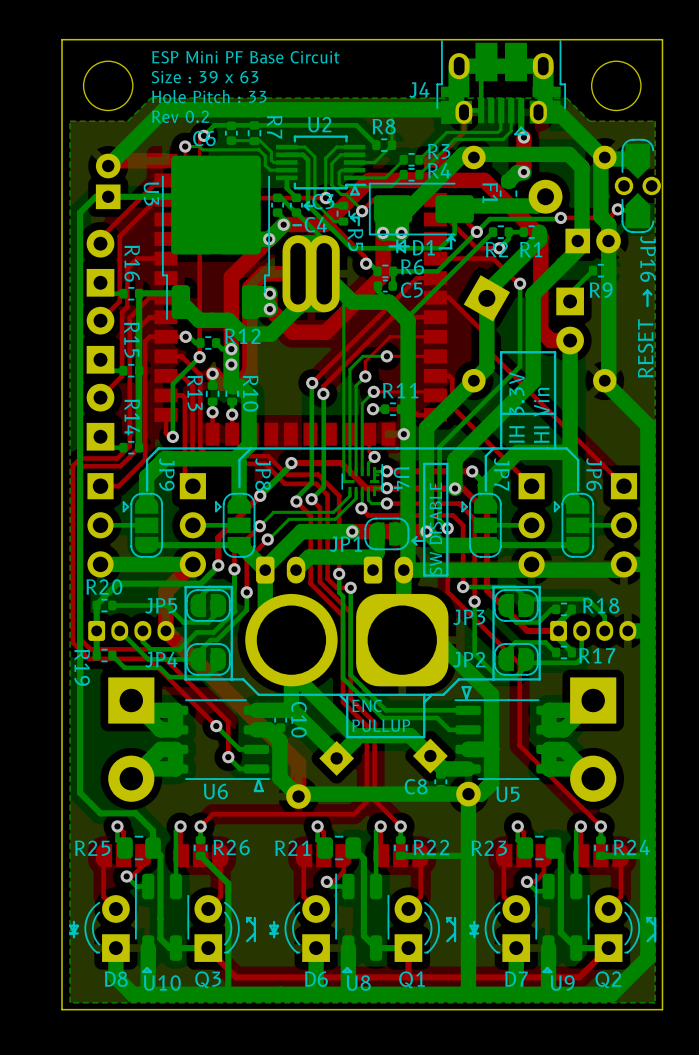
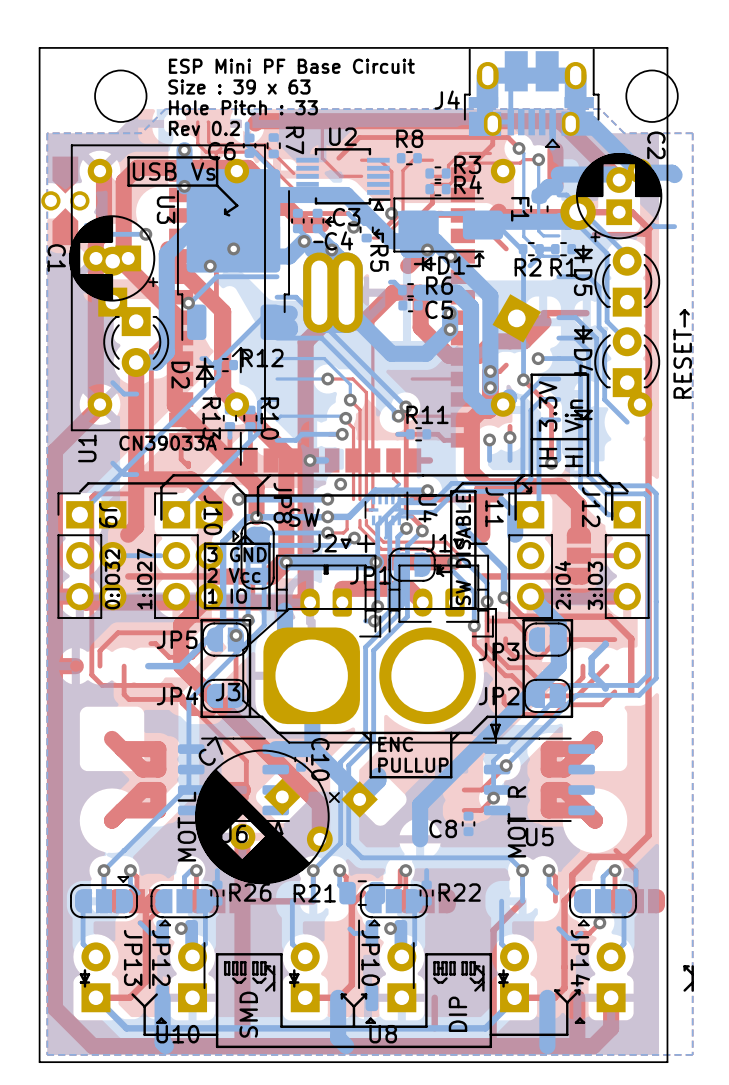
board edge: (62, 39) (62, 1009) -> (72, 47) (39, 47) (39, 1062) (72, 1062)
board edge: (631, 39) (662, 39) (662, 1009) (631, 1009) -> (667, 47) (667, 1062)
top track: none -> (197, 121) (197, 143) (206, 152) (256, 152) (293, 189)
top track: none -> (208, 121) (208, 142) (211, 144) (265, 144) (293, 173)
bottom track: (501, 110) (500, 129) (498, 132) (446, 132) (419, 159) -> none
bottom track: (511, 110) (511, 131) (503, 139) (454, 139) (419, 174) -> none
top track: none -> (255, 123) (257, 121) (560, 121) (619, 180)
bottom track: (456, 111) (453, 109) (164, 109) (108, 166) -> none
bottom track: none -> (247, 123) (247, 144) (277, 174)
top track: none -> (322, 124) (322, 158) (340, 176) (361, 176)
bottom track: (392, 113) (392, 145) (374, 162) (354, 162) -> none
bottom zone outline: (70, 121) (70, 1002) -> (80, 133) (47, 133) (47, 1054) (80, 1054)
bottom track: (203, 135) (214, 125) (356, 125) (376, 145) -> none
via: (203, 135) -> none
top track: none -> (519, 148) (508, 137) (359, 137) (338, 158)
bottom track: none -> (519, 148) (523, 153) (523, 236) (543, 256) (558, 256)
via: none -> (519, 148)
bottom track: none -> (184, 150) (184, 186)
via: none -> (184, 150)
via: (523, 137) -> none
bottom track: (231, 140) (260, 140) (271, 152) (271, 160) (273, 162) (287, 162) -> none
top track: none -> (490, 153) (460, 153) (448, 165) (448, 173) (446, 176) (431, 176)
bottom track: (185, 146) (199, 146) (202, 149) (258, 149) (265, 156) (265, 165) (270, 170) (287, 170) -> none
via: (185, 146) -> none
top track: none -> (538, 159) (523, 159) (520, 163) (461, 163) (454, 169) (454, 179) (449, 184) (431, 184)
bottom track: none -> (538, 159) (538, 231) (543, 235) (558, 235)
via: none -> (538, 159)
bottom track: (286, 147) (305, 147) (314, 156) (314, 202) (334, 221) (343, 221) -> none
top track: none -> (361, 160) (380, 160) (391, 171) (391, 213)
bottom track: (354, 147) (336, 147) (325, 158) (325, 197) -> none
top track: none -> (432, 160) (413, 160) (403, 170) (403, 218) (382, 238) (373, 238)
bottom track: (286, 154) (302, 154) (307, 159) (307, 205) (332, 229) -> none
bottom track: (354, 154) (340, 154) (331, 163) (331, 185) (341, 194) (346, 194) (362, 211) -> none
text: none -> USB Vs (174, 171)
top track: none -> (99, 172) (104, 176) (104, 233) (95, 241) (95, 401) (99, 406) (54, 451) (54, 660)
bottom track: (403, 159) (385, 177) (354, 177) -> none
bottom track: (604, 159) (600, 162) (600, 216) (608, 224) (608, 378) (604, 382) (647, 425) (647, 625) -> none
top track: (165, 160) (113, 160) (108, 166) -> none
bottom track: none -> (558, 174) (613, 174) (619, 180)
bottom track: (354, 170) (341, 170) (339, 172) (339, 183) (342, 186) (391, 186) (403, 174) -> none
line: none -> (217, 185) (217, 157) (128, 157) (128, 185) (217, 185)
line: none -> (217, 185) (237, 205) (225, 213)
via: none -> (184, 186)
via: (523, 172) -> none
bottom track: (286, 177) (286, 188) (296, 197) -> none
top track: none -> (432, 192) (432, 203) (422, 213)
top track: (165, 180) (158, 180) (100, 238) (100, 243) -> none
bottom track: none -> (558, 194) (566, 194) (627, 255) (627, 261)
part: (108, 181) -> none
C2: none -> (619, 197)
part: none -> (65, 200)
JP16: (637, 185) -> none
bottom track: (277, 197) (280, 197) (293, 210) -> none
line: none -> (225, 213) (229, 215)
bottom track: (225, 198) (223, 196) (95, 196) (80, 212) (80, 792) (100, 813) (135, 813) (153, 830) (153, 848) (160, 855) (160, 938) (169, 948) (208, 948) -> none
via position: (325, 198) -> (353, 227)
bottom track: none -> (391, 213) (485, 213) (523, 251) (523, 379)
top track: none -> (496, 213) (498, 211) (632, 212) (648, 228) (648, 835) (627, 856) (590, 856) (572, 875) (572, 893) (564, 900) (564, 988) (554, 997) (514, 997)
top track: (165, 199) (156, 199) (119, 236) (119, 301) (100, 320) -> none
bottom track: none -> (558, 215) (568, 215) (607, 253) (607, 321) (627, 341)
bottom track: (508, 205) (505, 209) (454, 209) (454, 233) (440, 248) (351, 248) (332, 229) -> none
bottom track: none -> (86, 225) (95, 234) (145, 234)
top track: none -> (321, 225) (305, 225) (247, 167) (137, 167) (123, 181) (123, 263) (174, 314) (174, 405) (256, 487) (256, 517)
bottom track: (393, 209) (408, 209) (463, 154) (568, 154) (582, 167) (582, 245) (533, 294) (533, 381) (455, 459) (455, 488) -> none
via: (617, 209) -> none
via position: (362, 211) -> (391, 213)
top track: (334, 215) (334, 225) (366, 257) -> none
via: none -> (145, 234)
bottom track: (560, 217) (489, 219) (437, 271) (393, 271) (392, 286) -> none
via: (560, 217) -> none
top track: (435, 219) (448, 219) (476, 248) (499, 248) -> none
line: none -> (583, 245) (583, 262)
via: none -> (233, 248)
via: (476, 231) -> none
top track: none -> (168, 249) (168, 256) (223, 311) (223, 390) (286, 454) (286, 562) (271, 576) (216, 576)
bottom track: none -> (312, 249) (331, 249) (331, 294) (391, 353) (425, 353) (450, 329) (450, 313)
via: none -> (331, 249)
via: (383, 232) -> none
top track: (401, 232) (383, 232) (383, 275) (325, 332) (292, 332) (269, 309) (269, 293) -> none
bottom track: (492, 232) (408, 316) (403, 316) (377, 290) (377, 286) -> none
bottom track: (539, 232) (539, 239) (486, 292) (486, 367) (426, 428) (426, 531) (440, 545) (493, 545) -> none
line: none -> (591, 249) (575, 249) (583, 258) (591, 249)
via: (269, 239) -> none
via: none -> (450, 256)
C1: none -> (113, 258)
line: none -> (591, 258) (575, 258)
part: (593, 240) -> none
via: none -> (210, 266)
via: (499, 248) -> none
top track: (165, 258) (137, 258) (127, 268) (127, 306) (122, 312) (122, 376) (100, 397) -> none
bottom track: none -> (277, 276) (216, 276) (188, 303)
top track: (435, 258) (493, 258) (520, 283) -> none
bottom track: none -> (558, 276) (588, 276) (599, 287) (599, 327) (604, 332) (604, 399) (627, 422)
via: (366, 263) -> none
D5: none -> (627, 281)
bottom track: (593, 270) (570, 293) (570, 301) -> none
R9: (600, 270) -> none
top track: (298, 273) (263, 273) (249, 287) (249, 372) (239, 383) (221, 383) (213, 373) -> none
bottom track: (324, 273) (298, 273) (298, 307) (270, 334) (242, 334) (228, 320) (199, 320) (180, 301) -> none
bottom track: (324, 273) (352, 302) (389, 302) (408, 321) (408, 565) (403, 570) -> none
bottom track: (324, 273) (343, 293) (343, 480) (349, 481) -> none
top track: none -> (393, 292) (420, 292) (420, 327) (448, 355) (478, 355) (493, 341) (524, 341) (543, 321)
top track: none -> (393, 292) (363, 322) (325, 322) (305, 342) (305, 598) (310, 602) (85, 602) (79, 596) (54, 596)
top track: none -> (393, 292) (372, 313) (372, 509) (366, 509)
bottom track: none -> (420, 292) (456, 292) (471, 307) (471, 395) (482, 406) (500, 406) (509, 397)
bottom track: none -> (277, 297) (296, 297) (405, 406)
top track: (435, 278) (417, 278) (312, 383) -> none
via: none -> (188, 303)
bottom track: (520, 283) (520, 366) (439, 446) (439, 520) (447, 528) -> none
via: (520, 283) -> none
U1: none -> (168, 305)
R16: (131, 293) -> none
bottom track: (139, 293) (139, 447) -> none
bottom track: (180, 293) (139, 293) -> none
via: (269, 293) -> none
via: none -> (450, 313)
top track: none -> (586, 313) (543, 313)
top track: (165, 297) (149, 297) (129, 317) (129, 446) (117, 458) (80, 458) (72, 466) (72, 642) (89, 658) (149, 658) (216, 726) -> none
bottom track: none -> (277, 317) (262, 317) (218, 361) (218, 375) (79, 514)
top track: (435, 297) (448, 297) (491, 339) (491, 353) (624, 486) -> none
bottom track: none -> (558, 317) (575, 317) (596, 338) (596, 472) (609, 485) (648, 485) (656, 493) (656, 678) (639, 695) (576, 695) (506, 765)
line: none -> (583, 326) (583, 342)
via: (269, 309) -> none
via: none -> (450, 329)
line: none -> (591, 330) (583, 338) (575, 330) (591, 330)
bottom track: none -> (277, 338) (321, 338) (394, 410) (394, 418)
top track: (435, 317) (392, 317) (323, 386) (323, 393) -> none
bottom track: none -> (558, 338) (575, 338) (588, 350) (588, 476) (606, 493) (644, 493) (648, 497) (648, 674) (637, 685) (569, 685) (493, 761) (493, 798)
line: none -> (591, 338) (575, 338)
D2: none -> (136, 342)
part: (570, 320) -> none
top track: (185, 336) (149, 336) (145, 341) (145, 459) (118, 486) (100, 486) -> none
via: (185, 336) -> none
line: none -> (205, 358) (205, 386)
bottom track: none -> (277, 358) (324, 358) (350, 384) (350, 400)
top track: (435, 336) (390, 336) (365, 361) (365, 376) -> none
bottom track: none -> (538, 358) (575, 358) (580, 363) (580, 487) (608, 514) (627, 514)
via: none -> (538, 358)
part: (100, 340) -> none
top track: none -> (136, 362) (136, 526) (128, 534)
bottom track: none -> (136, 362) (156, 362) (166, 352) (166, 253) (225, 194) (346, 194) (392, 241) (435, 241) (490, 296) (490, 387)
top track: (570, 340) (550, 340) (540, 330) (540, 236) (484, 180) (369, 180) (324, 224) (283, 224) (231, 277) (231, 364) -> none
bottom track: (570, 340) (570, 497) (577, 505) -> none
D4: none -> (627, 362)
bottom track: (216, 342) (222, 349) (231, 349) (231, 385) (240, 386) (249, 395) (249, 445) (235, 458) -> none
top track: none -> (506, 365) (499, 371) (490, 371) (490, 409) (481, 410) (471, 419) (471, 472) (485, 486)
line: none -> (205, 366) (213, 378) (196, 378) (205, 366)
line: none -> (213, 366) (196, 366)
via: (231, 349) -> none
via: none -> (490, 371)
top track: (165, 356) (181, 356) (200, 375) (200, 448) (208, 456) (268, 456) (286, 474) (318, 474) (339, 495) (339, 573) -> none
top track: none -> (327, 379) (352, 379) (366, 392) (366, 499)
bottom track: none -> (327, 379) (277, 379)
via: none -> (327, 379)
bottom track: (386, 356) (362, 356) (349, 369) (349, 471) -> none
via: (386, 356) -> none
bottom track: none -> (558, 379) (542, 379) (522, 398) (522, 475) (514, 483) (451, 483) (432, 502) (399, 502) (377, 524) (377, 606)
bottom track: (199, 357) (172, 383) (172, 436) -> none
via: (199, 357) -> none
top track: none -> (523, 379) (551, 407) (551, 463)
via: none -> (523, 379)
via: (231, 364) -> none
via: none -> (490, 387)
R15: (131, 370) -> none
via: (212, 373) -> none
top track: (165, 375) (182, 375) (192, 386) (192, 452) (204, 463) (264, 463) (285, 483) (316, 483) (327, 495) (327, 578) (336, 587) (350, 587) -> none
bottom track: none -> (277, 399) (262, 399) (259, 402) (259, 431) (176, 514)
top track: (435, 375) (449, 375) (452, 379) (452, 406) (531, 486) -> none
bottom track: none -> (558, 399) (541, 399) (530, 410) (530, 479) (518, 491) (455, 491) (434, 512) (401, 512) (389, 524) (389, 611) (380, 620) (365, 621)
top track: none -> (350, 400) (359, 409) (359, 499)
via: none -> (350, 400)
bottom track: (365, 376) (356, 385) (356, 471) -> none
via: (365, 376) -> none
bottom track: (312, 383) (311, 482) (296, 498) (296, 501) -> none
via: (312, 383) -> none
top track: none -> (405, 406) (406, 511) (422, 527) (422, 530)
via: none -> (405, 406)
line: none -> (591, 410) (575, 410) (583, 419) (591, 410)
top track: none -> (341, 416) (353, 428) (353, 499)
bottom track: none -> (341, 416) (280, 416) (277, 419)
bottom track: (373, 391) (362, 403) (362, 471) -> none
bottom track: (323, 393) (323, 487) (311, 499) -> none
line: none -> (591, 419) (575, 419)
top track: (165, 395) (182, 395) (184, 398) (184, 478) (192, 486) -> none
bottom track: none -> (558, 419) (541, 419) (538, 422) (538, 506) (530, 514)
top track: none -> (510, 426) (510, 437)
bottom track: none -> (342, 434) (302, 434) (295, 440) (277, 440)
via: none -> (342, 434)
via: (373, 409) -> none
via: (212, 412) -> none
bottom track: none -> (510, 437) (510, 460)
via: none -> (510, 437)
via: (232, 414) -> none
bottom track: none -> (489, 439) (489, 460)
via: none -> (489, 439)
bottom track: none -> (558, 440) (558, 459) (554, 463) (551, 463) (551, 466) (553, 464)
part: (100, 417) -> none
text: none -> CN39033A (168, 443)
via: none -> (310, 460)
bottom track: none -> (326, 460) (310, 460)
via: (403, 434) -> none
via: (172, 436) -> none
via: none -> (551, 463)
R14: (131, 447) -> none
top track: none -> (136, 479) (190, 479) (224, 513)
bottom track: (570, 452) (517, 452) (485, 484) -> none
via: none -> (340, 484)
via: (374, 456) -> none
line: none -> (522, 483) (531, 491)
bottom track: (235, 458) (164, 458) (146, 476) (146, 505) -> none
bottom track: (235, 458) (239, 462) (239, 505) -> none
top track: none -> (485, 486) (560, 486) (578, 505) (578, 534)
top track: none -> (485, 486) (482, 489) (482, 534)
line: none -> (531, 487) (531, 491)
line: none -> (80, 491) (88, 483) (233, 483) (245, 495)
top track: (291, 463) (341, 463) (366, 488) (463, 488) (486, 512) (486, 590) (527, 630) (558, 630) -> none
bottom track: (291, 463) (260, 495) -> none
via: (291, 463) -> none
bottom track: none -> (427, 490) (375, 490) (349, 516) (248, 517) (223, 542) (223, 623) (180, 666) (148, 666)
via: none -> (427, 490)
line: none -> (531, 491) (527, 491)
line: none -> (627, 491) (619, 483) (462, 483) (450, 495) (245, 495)
line: none -> (245, 495) (245, 543)
via: none -> (238, 499)
bottom track: none -> (327, 499) (238, 499)
via: none -> (327, 499)
via: (386, 471) -> none
via: (472, 471) -> none
part footprint: [518, 473, 545, 578] -> [566, 526, 591, 585]
via: none -> (256, 517)
via: none -> (327, 516)
via: (386, 488) -> none
via: (455, 488) -> none
text: none -> SW (304, 517)
top track: none -> (347, 520) (347, 529) (343, 532) (327, 532)
top track: none -> (359, 520) (359, 527) (381, 549) (430, 549) (452, 570)
top track: none -> (366, 520) (366, 525) (383, 542) (446, 542) (460, 556)
bottom track: (349, 491) (349, 495) (333, 512) (273, 512) (259, 526) -> none
bottom track: (356, 491) (356, 498) (335, 519) (289, 519) (267, 539) -> none
bottom track: (368, 491) (368, 500) (371, 503) (386, 503) -> none
top track: (260, 495) (218, 537) (218, 565) -> none
via: (260, 495) -> none
bottom track: none -> (460, 524) (504, 568) (504, 597)
top track: (311, 499) (319, 507) (319, 581) (350, 612) (350, 698) (374, 722) (374, 800) (400, 826) (400, 855) -> none
via: (311, 499) -> none
bottom track: none -> (406, 528) (397, 537) (397, 614) (365, 647) (365, 737) (340, 762) (340, 843) (313, 870) (313, 901)
via: none -> (406, 528)
top track: (296, 501) (310, 515) (310, 583) (343, 615) (343, 702) (366, 725) (366, 801) (354, 814) (212, 814) (200, 826) (200, 855) -> none
via: (296, 501) -> none
bottom track: none -> (422, 530) (407, 545) (407, 616) (373, 650) (373, 740) (348, 765) (348, 844) (362, 857) (509, 857) (522, 870) (522, 901)
via: none -> (422, 530)
bottom track: none -> (327, 532) (252, 532) (236, 549) (236, 635)
via: none -> (327, 532)
top track: (386, 503) (458, 503) (474, 519) (474, 601) -> none
via: (386, 503) -> none
line: none -> (366, 535) (366, 551)
bottom track: none -> (354, 538) (347, 545) (258, 545) (248, 555) (248, 620)
via: none -> (354, 538)
top track: (361, 508) (368, 515) (453, 515) (463, 525) (463, 587) -> none
via: (361, 508) -> none
line: none -> (349, 539) (341, 539) (345, 547) (349, 539)
line: none -> (462, 539) (454, 539) (458, 547) (462, 539)
line: none -> (253, 543) (245, 535) (237, 543)
line: none -> (269, 543) (269, 608) (205, 608) (205, 543) (269, 543)
line: none -> (374, 543) (357, 543)
line: none -> (486, 543) (470, 543)
text: none -> 3 GND (236, 554)
J9: none -> (79, 555)
JP9: (142, 525) -> none
J10: none -> (176, 555)
bottom track: (239, 525) (192, 525) -> none
JP7: (481, 525) -> none
J11: none -> (530, 555)
bottom track: (531, 525) (485, 525) -> none
JP6: (573, 525) -> none
top track: none -> (627, 555) (578, 555)
J12: none -> (627, 555)
bottom track: (624, 525) (577, 525) -> none
part: (624, 525) -> none
via: (259, 526) -> none
bottom track: none -> (460, 556) (487, 583) (487, 601)
bottom track: none -> (264, 558) (264, 625) (188, 700) (188, 785) (124, 850)
top track: (447, 528) (447, 592) (519, 664) (519, 745) (581, 807) -> none
via: (447, 528) -> none
via: none -> (286, 562)
bottom track: (301, 531) (265, 567) (265, 570) (239, 545) -> (322, 562) (286, 562)
top track: (267, 539) (246, 560) (246, 592) -> none
via: (267, 539) -> none
bottom track: none -> (452, 570) (474, 592) (474, 625)
text: none -> 2 Vcc (233, 575)
top track: none -> (224, 576) (128, 576)
bottom track: (238, 545) (146, 545) -> none
top track: none -> (578, 576) (482, 576)
bottom track: (577, 545) (485, 545) -> none
text: none -> 0:IO32 (112, 579)
text: none -> 1:IO27 (144, 579)
top track: none -> (342, 588) (409, 588) (422, 602)
bottom track: (373, 557) (309, 557) (296, 570) -> none
text: none -> 2:IO4 (562, 585)
text: none -> 3:IO3 (595, 585)
bottom track: (192, 564) (100, 564) -> none
text: none -> 1 IO (227, 596)
bottom track: none -> (530, 596) (558, 624) (558, 666) (420, 804) (420, 839)
top track: none -> (627, 596) (530, 596)
bottom track: (647, 564) (624, 564) (618, 570) (403, 570) -> none
via: (218, 565) -> none
via: none -> (504, 597)
bottom track: (218, 566) (200, 583) (117, 583) (96, 604) (96, 655) -> none
top track: none -> (504, 598) (522, 616) (609, 616) (631, 638) (631, 691)
bottom track: (234, 569) (234, 611) (213, 632) (196, 632) (179, 649) (150, 649) (142, 641) (142, 630) -> none
via: (234, 569) -> none
top track: none -> (487, 601) (487, 646) (508, 667) (526, 667) (544, 685) (574, 685) (582, 677) (582, 666)
via: none -> (487, 601)
J1 side: top (280, 570) -> bottom (441, 596)
J2 side: top (388, 570) -> bottom (328, 596)
bottom track: (403, 570) (403, 638) (402, 640) (436, 640) (491, 694) (491, 783) (480, 794) (300, 794) (298, 796) (279, 777) (279, 740) (268, 729) (256, 729) -> none
bottom track: (339, 573) (339, 592) (343, 596) (343, 678) (382, 717) (437, 717) (449, 729) (468, 729) -> none
via position: (339, 573) -> (377, 606)
top track: none -> (248, 620) (194, 620) (182, 632) (182, 639) (175, 632) (118, 632) (99, 650) (99, 666)
via: none -> (248, 620)
bottom track: (350, 587) (350, 675) (385, 710) (468, 710) -> none
top track: none -> (487, 621) (513, 621) (524, 632) (524, 639)
bottom track: (463, 587) (514, 587) (526, 598) (526, 605) (532, 599) (587, 599) (604, 616) (604, 630) -> none
via: (463, 587) -> none
bottom track: (246, 592) (246, 610) (216, 640) (210, 640) (198, 652) (198, 659) (148, 659) (119, 630) -> none
via: (246, 592) -> none
top track: none -> (474, 625) (474, 644) (505, 675) (512, 675) (524, 688) (524, 695) (577, 695) (607, 666)
via: none -> (474, 625)
top track: none -> (236, 635) (236, 690) (212, 713) (192, 713) (182, 703) (182, 695) (178, 699) (129, 699) (124, 694) (124, 666)
via: none -> (236, 635)
bottom track: (474, 601) (474, 654) (496, 676) (516, 676) (526, 666) (526, 659) (529, 662) (576, 662) (581, 658) (581, 630) -> none
via: (474, 601) -> none
bottom track: (216, 604) (216, 613) (208, 622) (183, 622) (166, 605) (112, 605) -> none
top track: none -> (505, 638) (505, 648) (514, 657) (540, 657) (557, 639) (614, 639)
R20: (104, 605) -> none
top track: none -> (203, 639) (203, 646) (192, 657) (169, 657) (155, 643) (150, 643)
bottom track: (506, 605) (506, 612) (516, 622) (538, 622) (551, 609) (556, 609) -> none
R18: (563, 609) -> none
top track: none -> (75, 666) (54, 666) (54, 1008) (92, 1046) (593, 1046) (611, 1028) (611, 997)
part: (131, 630) -> none
part: (593, 630) -> none
bottom track: (627, 630) (647, 630) (647, 958) (611, 994) (132, 994) (115, 977) (115, 948) -> none
J3 side: top (346, 640) -> bottom (369, 675)
bottom track: (506, 651) (515, 642) (545, 642) (556, 652) -> none
R17: (563, 652) -> none
R19: (104, 655) -> none
bottom track: (112, 655) (124, 667) (160, 667) (169, 677) (207, 677) (218, 666) (218, 659) -> none
top track: none -> (614, 691) (601, 704) (564, 704) (555, 714) (515, 714) (504, 703) (504, 695)
bottom track: (291, 672) (354, 735) (409, 735) (443, 768) (468, 768) -> none
top track: none -> (112, 738) (142, 769) (158, 769) (158, 749) (122, 749)
bottom track: (131, 700) (160, 729) (175, 729) (175, 710) (141, 710) -> none
top track: none -> (595, 738) (564, 769) (548, 769) (548, 749) (584, 749)
bottom track: (593, 700) (563, 729) (548, 729) (548, 710) (583, 710) -> none
bottom track: (216, 726) (239, 749) (256, 749) -> none
via: (216, 726) -> none
top track: none -> (506, 765) (481, 790) (464, 790)
via: none -> (506, 765)
part: (131, 739) -> none
part: (593, 739) -> none
bottom track: (228, 757) (240, 768) (256, 768) -> none
via: (228, 757) -> none
top track: none -> (493, 798) (481, 810) (464, 810)
via: none -> (493, 798)
top track: none -> (122, 810) (158, 810) (158, 790) (142, 790) (112, 820)
bottom track: (141, 768) (175, 768) (175, 749) (160, 749) (131, 778) -> none
top track: none -> (584, 810) (548, 810) (548, 790) (564, 790) (595, 820)
bottom track: (583, 768) (548, 768) (548, 749) (563, 749) (593, 778) -> none
C7 side: top (446, 772) -> bottom (267, 816)
text: none -> MOT R (517, 821)
text: none -> MOT L (186, 826)
top track: none -> (242, 836) (242, 1044) (240, 1046)
bottom track: (468, 794) (468, 992) (470, 994) -> none
bottom track: none -> (124, 850) (104, 870) (104, 901)
via: none -> (104, 870)
bottom track: none -> (190, 870) (184, 877) (184, 901)
bottom track: (180, 826) (175, 831) (175, 886) -> none
via: (200, 826) -> none
via: none -> (313, 870)
top track: none -> (400, 870) (400, 885) (392, 893)
bottom track: (380, 826) (376, 831) (376, 886) -> none
via: (400, 826) -> none
via: none -> (522, 870)
bottom track: none -> (609, 870) (603, 877) (603, 901)
bottom track: (580, 826) (576, 831) (576, 886) -> none
via: (600, 826) -> none
top track: none -> (153, 893) (145, 900) (145, 981) (129, 997) (95, 997)
R25: (139, 848) -> none
top track: none -> (362, 893) (351, 904) (351, 984) (339, 997) (305, 997)
bottom track: (353, 848) (363, 858) (363, 935) (376, 948) (408, 948) -> none
R23: (539, 848) -> none
bottom track: (553, 848) (560, 855) (560, 932) (576, 948) (608, 948) -> none
R24: (600, 848) -> none
top track: none -> (242, 894) (249, 901) (313, 901)
bottom track: (468, 849) (462, 855) (400, 855) -> none
JP13: none -> (104, 897)
bottom track: none -> (83, 901) (83, 943) (95, 956)
top track: (103, 855) (103, 896) (115, 908) -> none
bottom track: none -> (205, 901) (205, 943) (192, 956)
bottom track: (200, 855) (228, 883) (228, 992) (226, 994) -> none
top track: (220, 855) (220, 896) (208, 908) -> none
bottom track: none -> (292, 901) (292, 943) (305, 956)
top track: (303, 855) (303, 896) (316, 908) -> none
JP10 side: top (323, 855) -> bottom (393, 905)
top track: (343, 855) (343, 871) (333, 882) (327, 882) -> none
bottom track: none -> (414, 901) (414, 943) (401, 956)
top track: (420, 855) (420, 896) (408, 908) -> none
bottom track: none -> (501, 901) (501, 943) (514, 956)
top track: none -> (522, 901) (493, 930) (493, 1044) (495, 1046)
top track: (503, 855) (503, 896) (516, 908) -> none
JP12 side: top (523, 855) -> bottom (184, 905)
top track: (543, 855) (543, 872) (534, 881) (527, 881) -> none
bottom track: none -> (623, 901) (623, 943) (611, 956)
top track: (620, 855) (620, 896) (608, 908) -> none
bottom track: (647, 855) (600, 855) -> none
JP14: none -> (603, 905)
via: (126, 876) -> none
top track: none -> (599, 922) (589, 933) (577, 933)
via: none -> (599, 922)
via: none -> (181, 928)
via: (326, 881) -> none
via: none -> (390, 928)
via: (527, 881) -> none
line: none -> (490, 954) (426, 954) (426, 1026) (281, 1026) (281, 954) (217, 954) (217, 1046) (490, 1046) (490, 954)
line: none -> (229, 962) (225, 962) (225, 974) (229, 974) (229, 962)
line: none -> (237, 962) (233, 962) (233, 974) (237, 974) (237, 962)
line: none -> (245, 962) (241, 962) (241, 974) (245, 974) (245, 962)
line: none -> (257, 962) (253, 962) (253, 974) (257, 974) (257, 962)
line: none -> (265, 962) (261, 962) (261, 974) (265, 974) (265, 962)
line: none -> (438, 962) (434, 962) (434, 974) (438, 974) (438, 962)
line: none -> (446, 962) (442, 962) (442, 974) (446, 974) (446, 962)
line: none -> (454, 962) (450, 962) (450, 974) (454, 974) (454, 962)
line: none -> (466, 962) (462, 962) (462, 974) (466, 974) (466, 962)
line: none -> (474, 962) (470, 962) (470, 974) (474, 974) (474, 962)
U9: (562, 917) -> none
line: none -> (442, 968) (438, 968)
part: none -> (95, 977)
D8: (107, 928) -> none
Q3 side: bottom (217, 928) -> top (514, 977)
D6 side: bottom (307, 928) -> top (401, 977)
Q1 side: bottom (417, 928) -> top (305, 977)
D7 side: bottom (507, 928) -> top (192, 977)
part: none -> (611, 977)
Q2: (617, 928) -> none
line: none -> (245, 978) (241, 982) (237, 982) (233, 978)
line: none -> (265, 978) (261, 982) (257, 982) (253, 978)
line: none -> (446, 978) (442, 982) (438, 982) (434, 978)
line: none -> (482, 978) (478, 982) (474, 982) (470, 978)
line: none -> (559, 990) (555, 990) (567, 1002)
line: none -> (579, 990) (575, 990)
line: none -> (579, 990) (567, 1002)
line: none -> (579, 990) (579, 994)
line: none -> (132, 994) (144, 1006)
line: none -> (156, 994) (144, 1006)
line: none -> (341, 994) (353, 1006)
line: none -> (341, 994) (341, 998)
line: none -> (345, 994) (341, 994)
line: none -> (366, 994) (362, 994)
line: none -> (366, 994) (353, 1006)
line: none -> (366, 994) (366, 998)
bottom track: (348, 948) (348, 994) -> none
bottom track: none -> (514, 997) (485, 1028) (126, 1028) (95, 997)
top track: none -> (577, 997) (577, 1042) (574, 1046)
bottom track: (548, 948) (548, 994) -> none
top track: (608, 948) (579, 977) (236, 977) (208, 948) -> none
line: none -> (567, 1002) (567, 1034) (490, 1034)
line: none -> (144, 1006) (144, 1034) (217, 1034)
line: none -> (353, 1006) (353, 1026)
text: none -> DIP (458, 1014)
text: none -> SMD (248, 1014)

